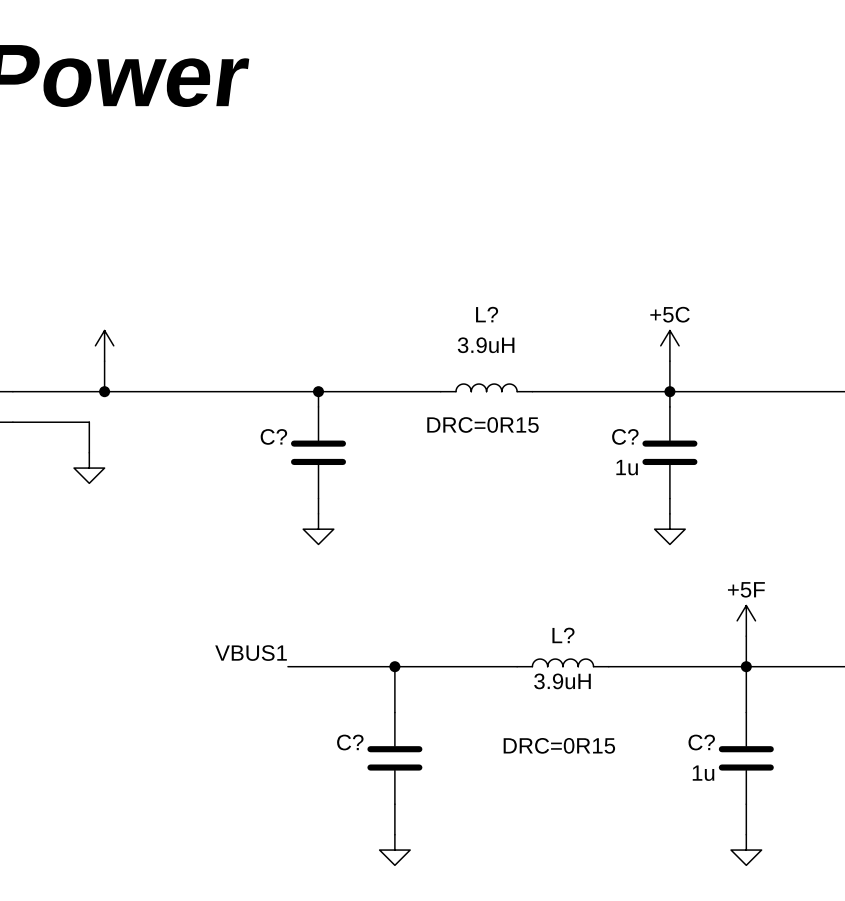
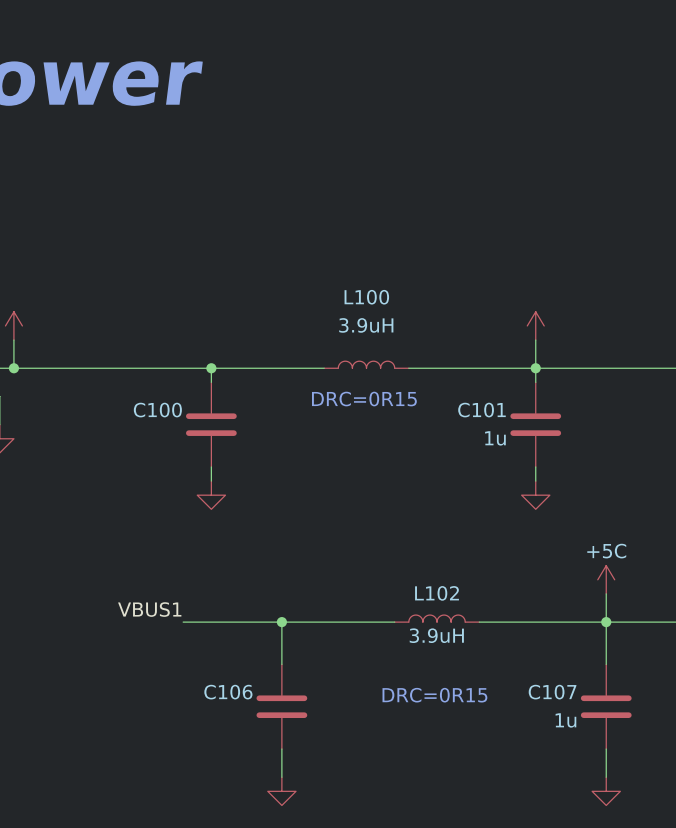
L? name: L? (487, 314) -> L100 (366, 297)
power symbol text: +5C (670, 314) -> none
C? name: C? (273, 436) -> C100 (157, 410)
C? name: C? (625, 436) -> C101 (481, 410)
power symbol: +5F (746, 620) -> +5C (606, 579)
L? name: L? (563, 635) -> L102 (437, 593)
C? name: C? (350, 742) -> C106 (228, 692)
C? name: C? (701, 742) -> C107 (552, 692)

